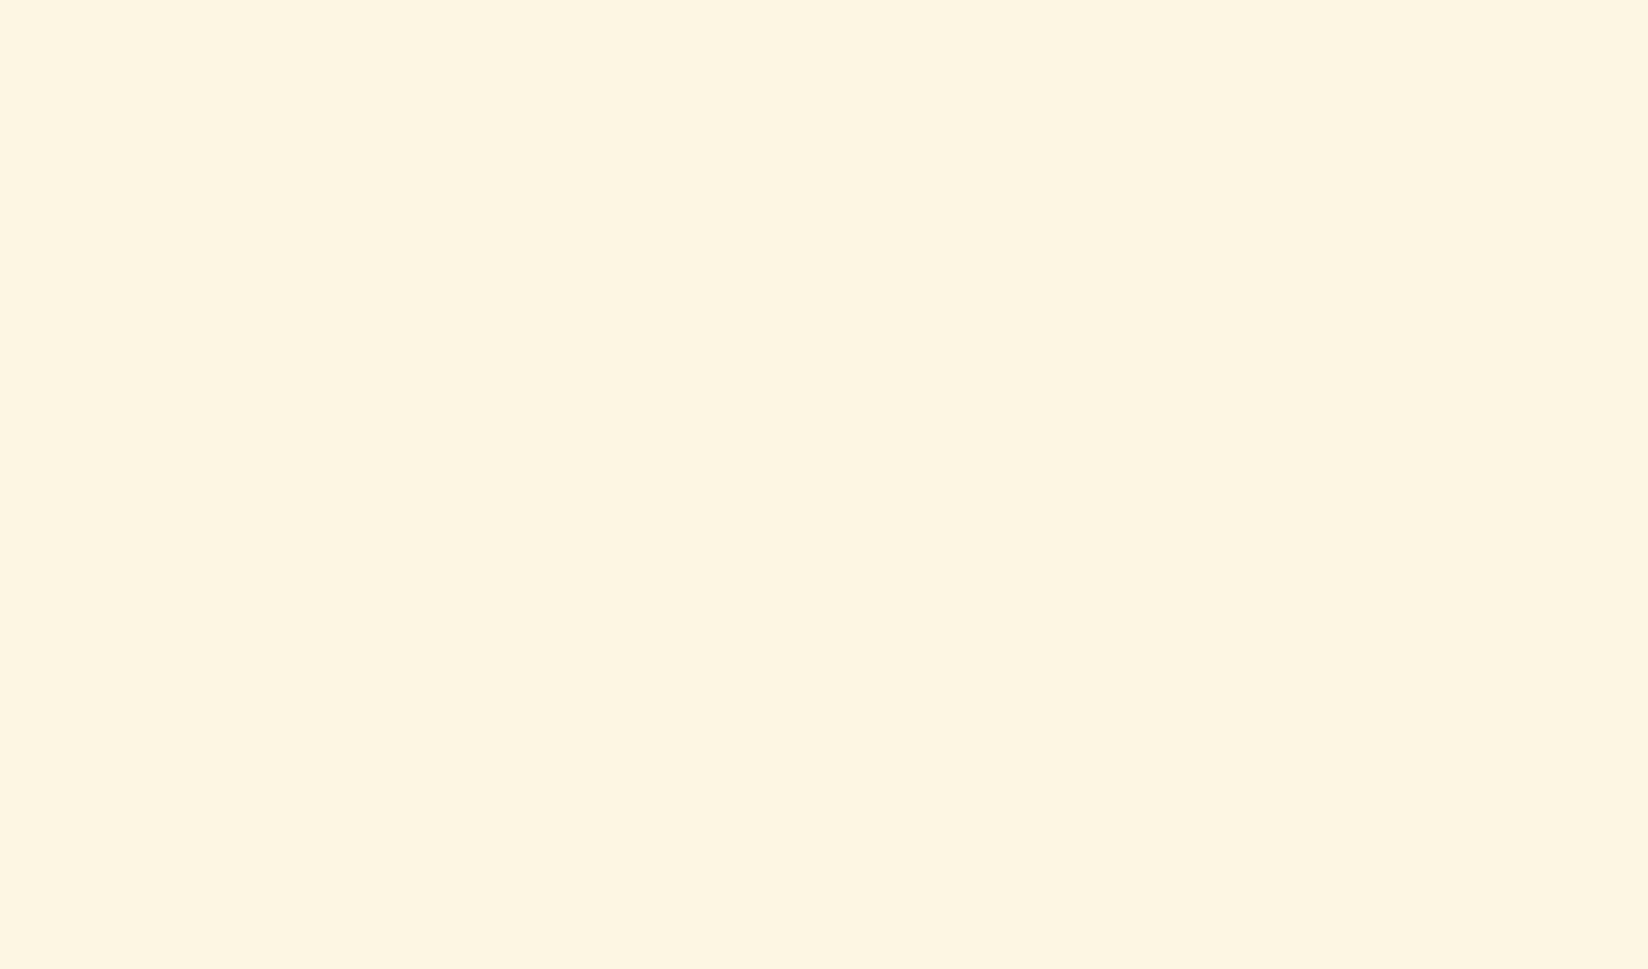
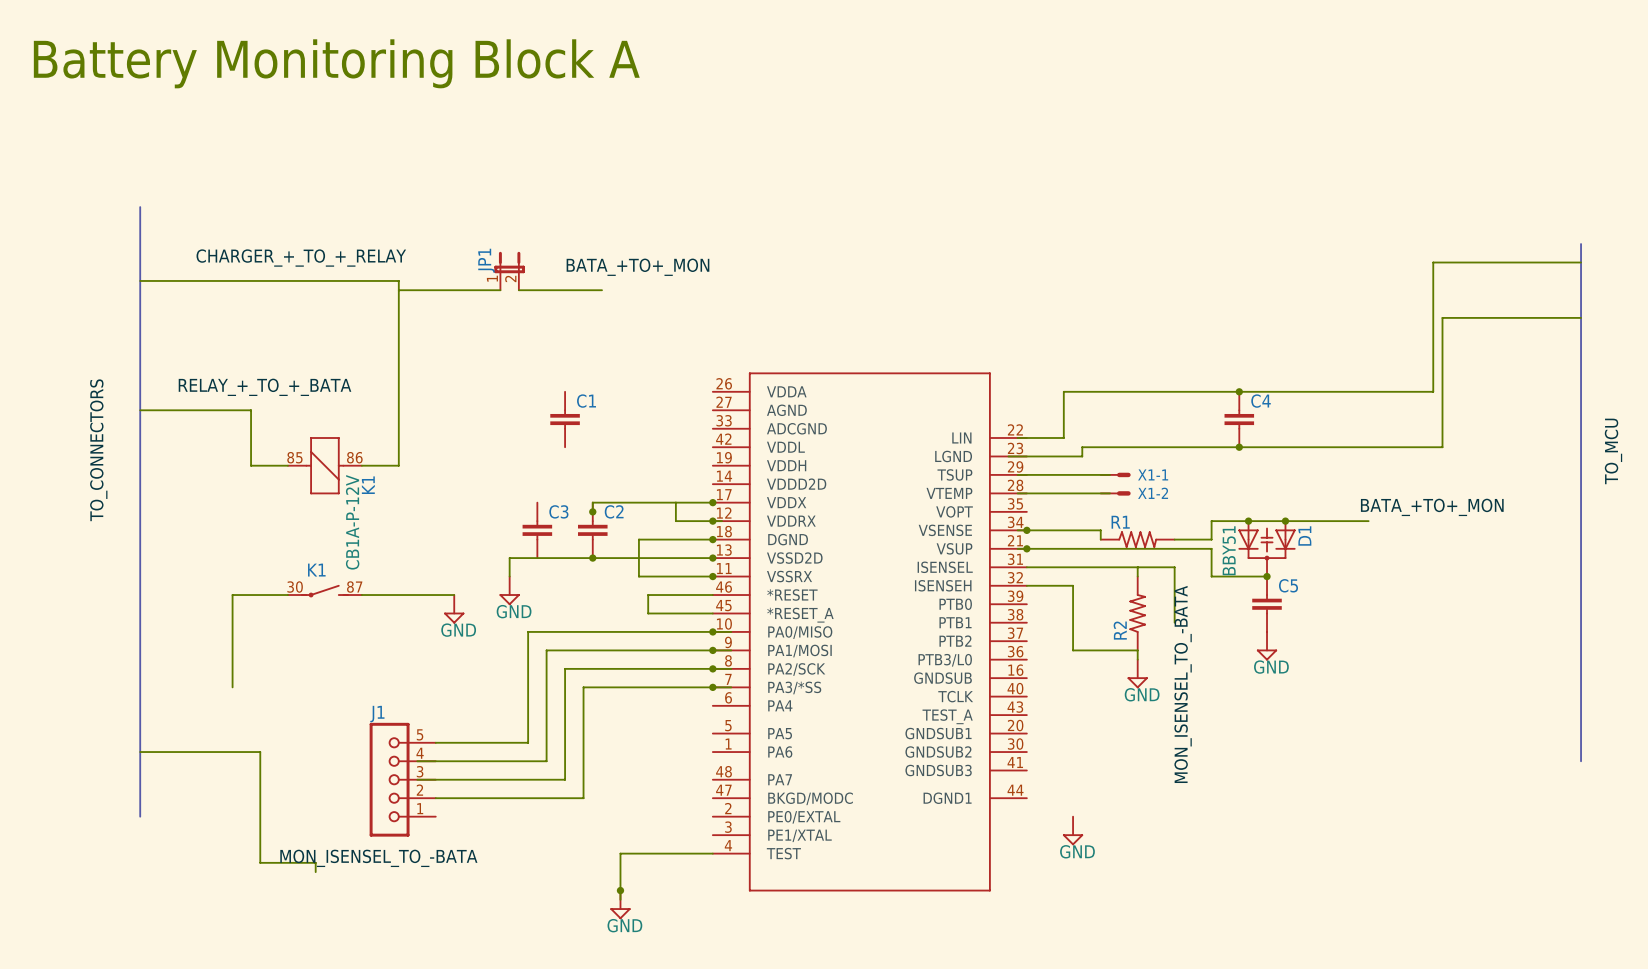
text: none -> Battery Monitoring Block A (336, 63)
bus: none -> (140, 207) (140, 816)
bus: none -> (1581, 244) (1581, 761)
label: none -> CHARGER_+_TO_+_RELAY (301, 258)
wire: none -> (1581, 262) (1433, 262) (1433, 391) (1063, 391) (1063, 437) (1017, 437)
label: none -> BATA_+TO+_MON (637, 267)
JP1: none -> (509, 271)
wire: none -> (140, 280) (398, 280) (398, 465) (361, 465)
wire: none -> (398, 290) (500, 290)
wire: none -> (518, 290) (602, 290)
wire: none -> (1581, 317) (1442, 317) (1442, 447) (1082, 447) (1082, 456) (1008, 456)
label: none -> RELAY_+_TO_+_BATA (265, 387)
junction: none -> (1239, 391)
wire: none -> (140, 410) (251, 410) (251, 465) (287, 465)
C1: none -> (565, 419)
C4: none -> (1239, 419)
junction: none -> (1239, 447)
label: none -> TO_CONNECTORS (98, 450)
label: none -> TO_MCU (1613, 451)
K1: none -> CB1A-P-12V (324, 465)
wire: none -> (1017, 474) (1109, 474)
X1-1: none -> (1115, 474)
wire: none -> (1017, 493) (1109, 493)
X1-2: none -> (1115, 493)
wire: none -> (675, 502) (675, 521) (722, 521)
wire: none -> (712, 502) (592, 502) (592, 511)
junction: none -> (712, 502)
label: none -> BATA_+TO+_MON (1432, 507)
junction: none -> (592, 511)
junction: none -> (712, 521)
junction: none -> (1248, 521)
junction: none -> (1285, 521)
wire: none -> (1368, 521) (1211, 521) (1211, 539) (1174, 539)
C3: none -> (537, 530)
C2: none -> (592, 530)
wire: none -> (1017, 530) (1100, 530) (1100, 539)
junction: none -> (1026, 530)
wire: none -> (712, 539) (638, 539) (638, 576) (712, 576)
junction: none -> (712, 539)
R1: none -> (1137, 539)
wire: none -> (1017, 548) (1211, 548) (1211, 576) (1267, 576)
junction: none -> (1026, 548)
D1: none -> BBY51 (1267, 548)
junction: none -> (592, 558)
wire: none -> (712, 558) (509, 558) (509, 576)
junction: none -> (712, 558)
wire: none -> (1026, 567) (1174, 567) (1174, 622)
wire: none -> (1137, 567) (1137, 576)
junction: none -> (712, 576)
junction: none -> (1267, 576)
wire: none -> (1026, 585) (1073, 585) (1073, 650) (1137, 650) (1137, 659)
power symbol: none -> GND (509, 590)
K1: none -> (324, 591)
wire: none -> (287, 595) (232, 595) (232, 687)
wire: none -> (361, 595) (454, 595)
wire: none -> (712, 595) (648, 595) (648, 613) (712, 613)
C5: none -> (1267, 604)
power symbol: none -> GND (454, 609)
R2: none -> (1137, 613)
junction: none -> (712, 631)
wire: none -> (731, 631) (528, 631) (528, 742) (435, 742)
part: none -> (869, 631)
power symbol: none -> GND (1267, 646)
junction: none -> (712, 650)
wire: none -> (731, 650) (546, 650) (546, 761) (417, 761)
junction: none -> (712, 668)
wire: none -> (731, 668) (565, 668) (565, 779) (417, 779)
power symbol: none -> GND (1137, 673)
label: none -> MON_ISENSEL_TO_-BATA (1183, 684)
junction: none -> (712, 687)
wire: none -> (731, 687) (583, 687) (583, 798) (435, 798)
wire: none -> (140, 752) (260, 752) (260, 862) (315, 862) (315, 872)
J1: none -> (402, 779)
power symbol: none -> GND (1073, 830)
wire: none -> (712, 853) (620, 853) (620, 899)
label: none -> MON_ISENSEL_TO_-BATA (378, 858)
junction: none -> (620, 890)
power symbol: none -> GND (620, 904)

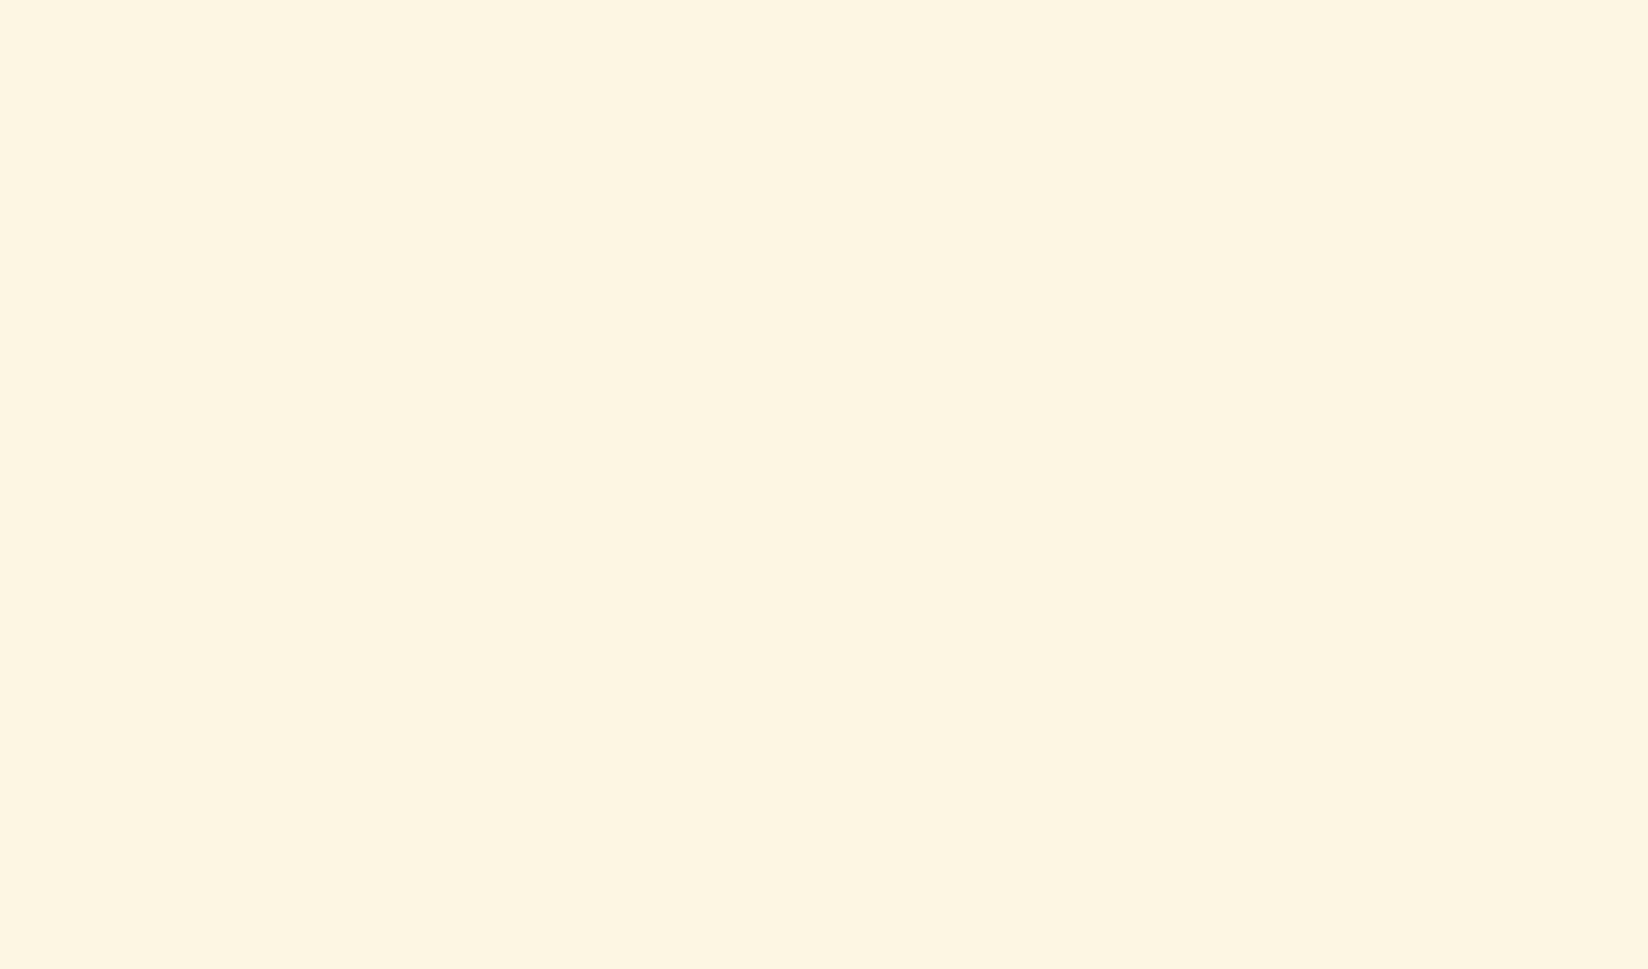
text: Battery Monitoring Block A (336, 63) -> none
bus: (140, 207) (140, 816) -> none
bus: (1581, 244) (1581, 761) -> none
label: CHARGER_+_TO_+_RELAY (301, 258) -> none
wire: (1581, 262) (1433, 262) (1433, 391) (1063, 391) (1063, 437) (1017, 437) -> none
label: BATA_+TO+_MON (637, 267) -> none
JP1: (509, 271) -> none
wire: (140, 280) (398, 280) (398, 465) (361, 465) -> none
wire: (398, 290) (500, 290) -> none
wire: (518, 290) (602, 290) -> none
wire: (1581, 317) (1442, 317) (1442, 447) (1082, 447) (1082, 456) (1008, 456) -> none
label: RELAY_+_TO_+_BATA (265, 387) -> none
junction: (1239, 391) -> none
wire: (140, 410) (251, 410) (251, 465) (287, 465) -> none
C1: (565, 419) -> none
C4: (1239, 419) -> none
junction: (1239, 447) -> none
label: TO_CONNECTORS (98, 450) -> none
label: TO_MCU (1613, 451) -> none
K1: CB1A-P-12V (324, 465) -> none
wire: (1017, 474) (1109, 474) -> none
X1-1: (1115, 474) -> none
wire: (1017, 493) (1109, 493) -> none
X1-2: (1115, 493) -> none
wire: (675, 502) (675, 521) (722, 521) -> none
wire: (712, 502) (592, 502) (592, 511) -> none
junction: (712, 502) -> none
label: BATA_+TO+_MON (1432, 507) -> none
junction: (592, 511) -> none
junction: (712, 521) -> none
junction: (1248, 521) -> none
junction: (1285, 521) -> none
wire: (1368, 521) (1211, 521) (1211, 539) (1174, 539) -> none
C3: (537, 530) -> none
C2: (592, 530) -> none
wire: (1017, 530) (1100, 530) (1100, 539) -> none
junction: (1026, 530) -> none
wire: (712, 539) (638, 539) (638, 576) (712, 576) -> none
junction: (712, 539) -> none
R1: (1137, 539) -> none
wire: (1017, 548) (1211, 548) (1211, 576) (1267, 576) -> none
junction: (1026, 548) -> none
D1: BBY51 (1267, 548) -> none
junction: (592, 558) -> none
wire: (712, 558) (509, 558) (509, 576) -> none
junction: (712, 558) -> none
wire: (1026, 567) (1174, 567) (1174, 622) -> none
wire: (1137, 567) (1137, 576) -> none
junction: (712, 576) -> none
junction: (1267, 576) -> none
wire: (1026, 585) (1073, 585) (1073, 650) (1137, 650) (1137, 659) -> none
power symbol: GND (509, 590) -> none
K1: (324, 591) -> none
wire: (287, 595) (232, 595) (232, 687) -> none
wire: (361, 595) (454, 595) -> none
wire: (712, 595) (648, 595) (648, 613) (712, 613) -> none
C5: (1267, 604) -> none
power symbol: GND (454, 609) -> none
R2: (1137, 613) -> none
junction: (712, 631) -> none
wire: (731, 631) (528, 631) (528, 742) (435, 742) -> none
part: (869, 631) -> none
power symbol: GND (1267, 646) -> none
junction: (712, 650) -> none
wire: (731, 650) (546, 650) (546, 761) (417, 761) -> none
junction: (712, 668) -> none
wire: (731, 668) (565, 668) (565, 779) (417, 779) -> none
power symbol: GND (1137, 673) -> none
label: MON_ISENSEL_TO_-BATA (1183, 684) -> none
junction: (712, 687) -> none
wire: (731, 687) (583, 687) (583, 798) (435, 798) -> none
wire: (140, 752) (260, 752) (260, 862) (315, 862) (315, 872) -> none
J1: (402, 779) -> none
power symbol: GND (1073, 830) -> none
wire: (712, 853) (620, 853) (620, 899) -> none
label: MON_ISENSEL_TO_-BATA (378, 858) -> none
junction: (620, 890) -> none
power symbol: GND (620, 904) -> none

